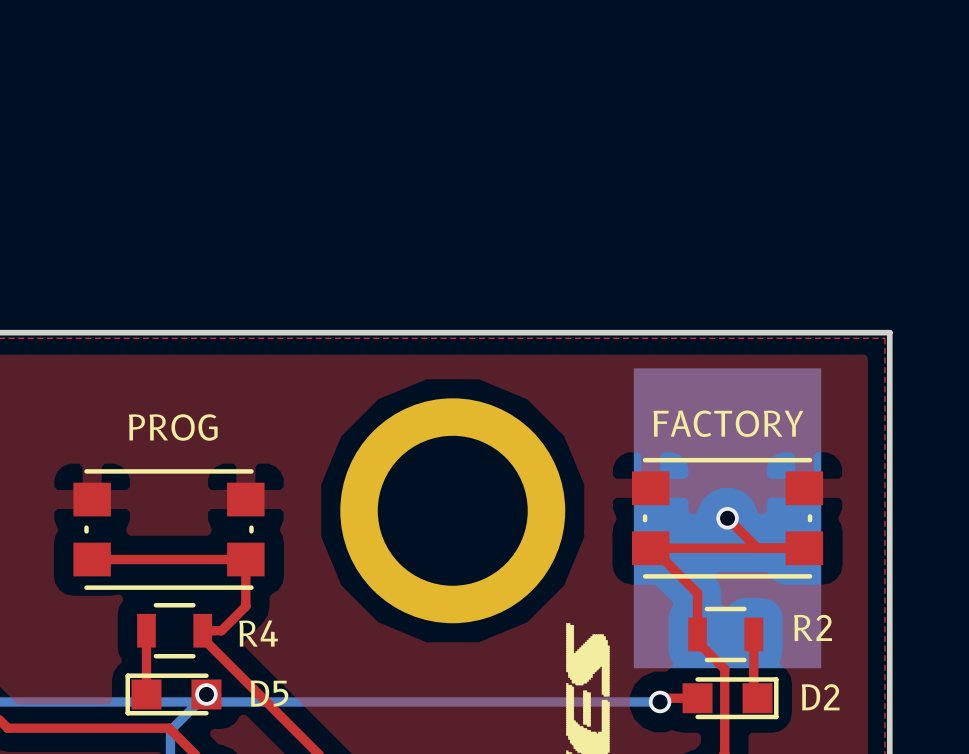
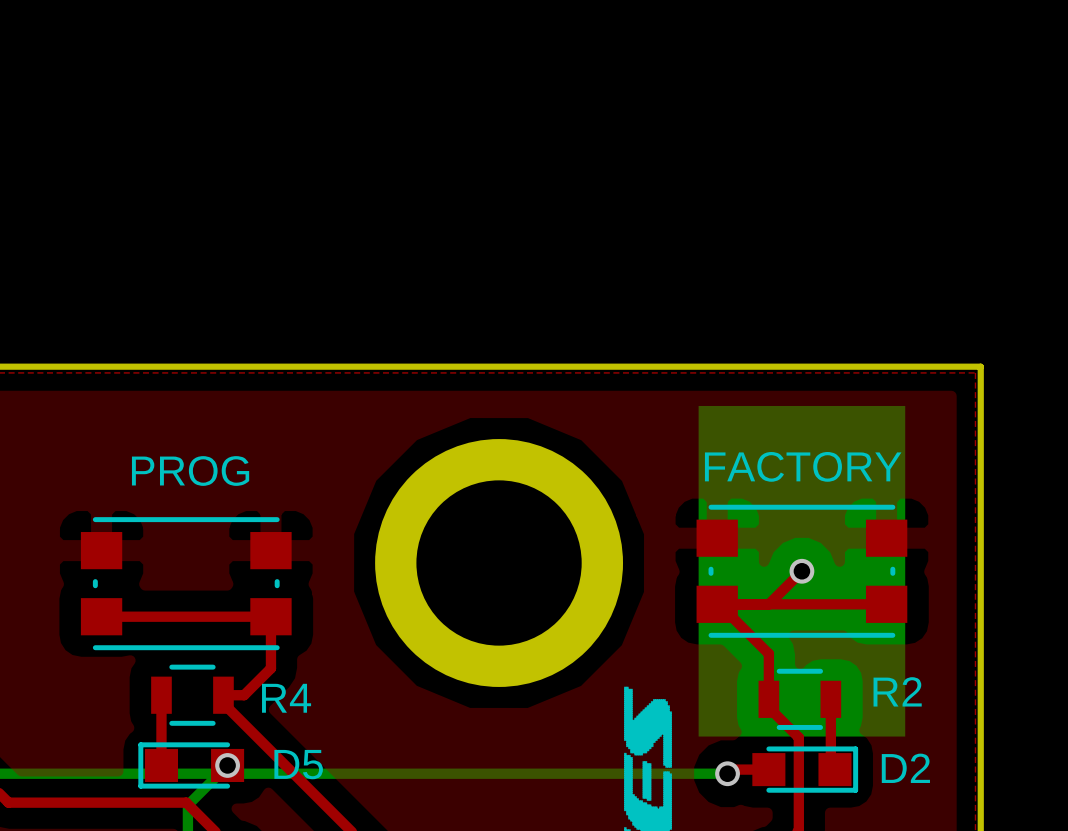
top track: (727, 518) (757, 548) -> (801, 571) (768, 604)

